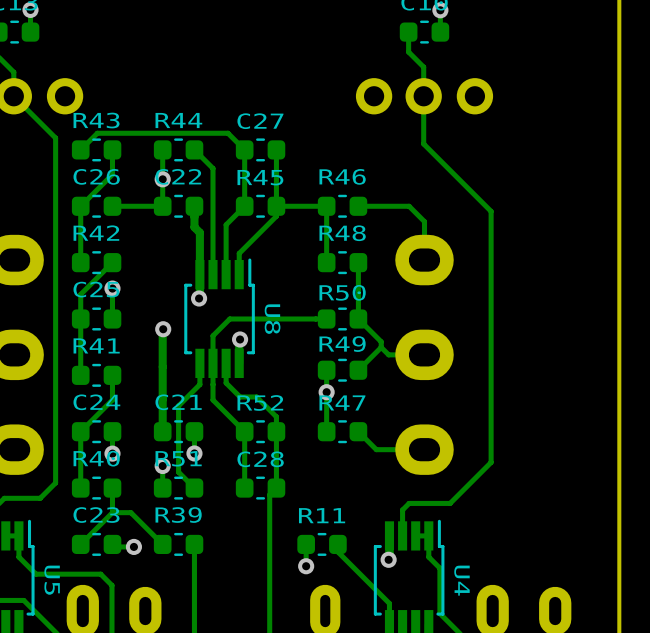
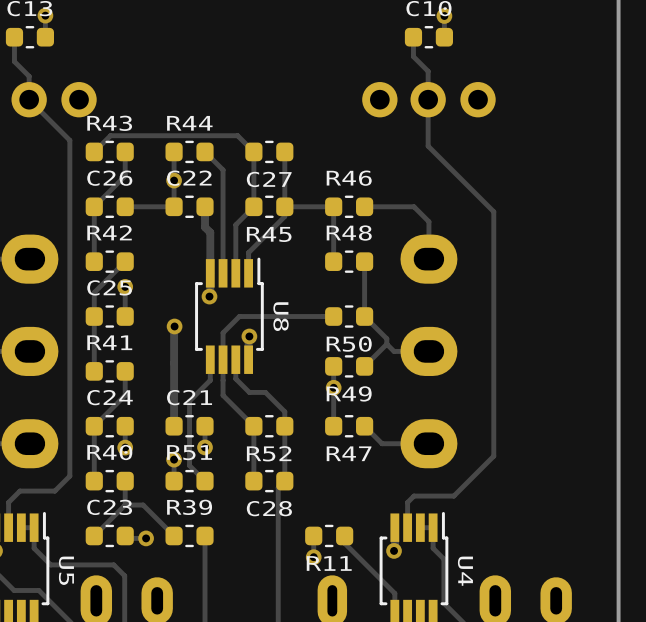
C27 name position: C27 (260, 121) -> C27 (269, 179)
R45 name position: R45 (260, 177) -> R45 (269, 234)
R50 name position: R50 (342, 292) -> R50 (349, 344)
R49 name position: R49 (342, 344) -> R49 (349, 393)
R52 name position: R52 (260, 402) -> R52 (269, 453)
R47 name position: R47 (342, 402) -> R47 (349, 453)
C28 name position: C28 (260, 459) -> C28 (269, 508)
R11 name position: R11 (322, 515) -> R11 (329, 563)

